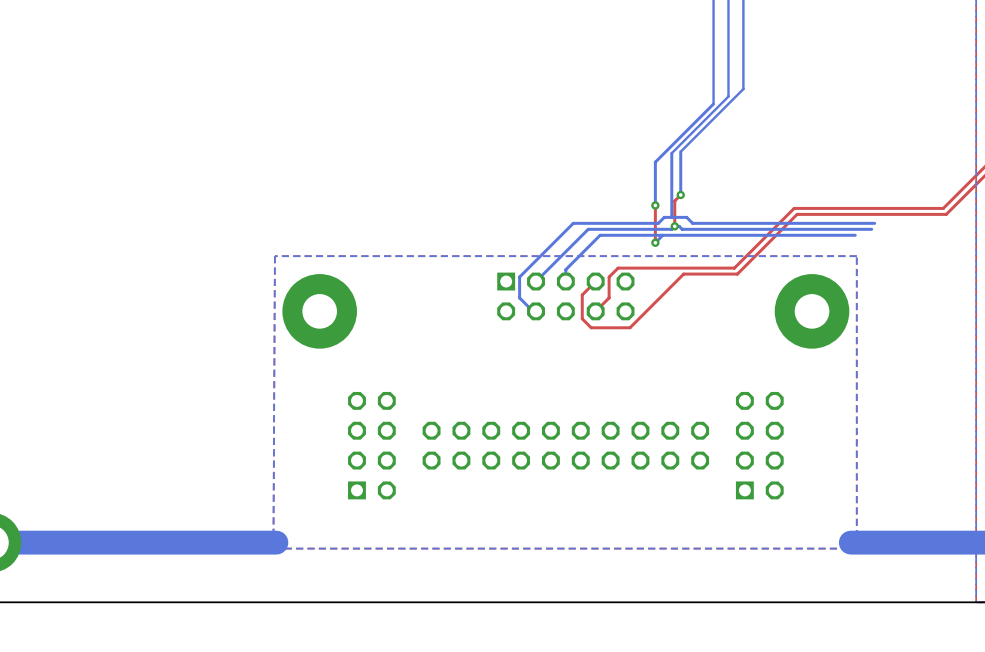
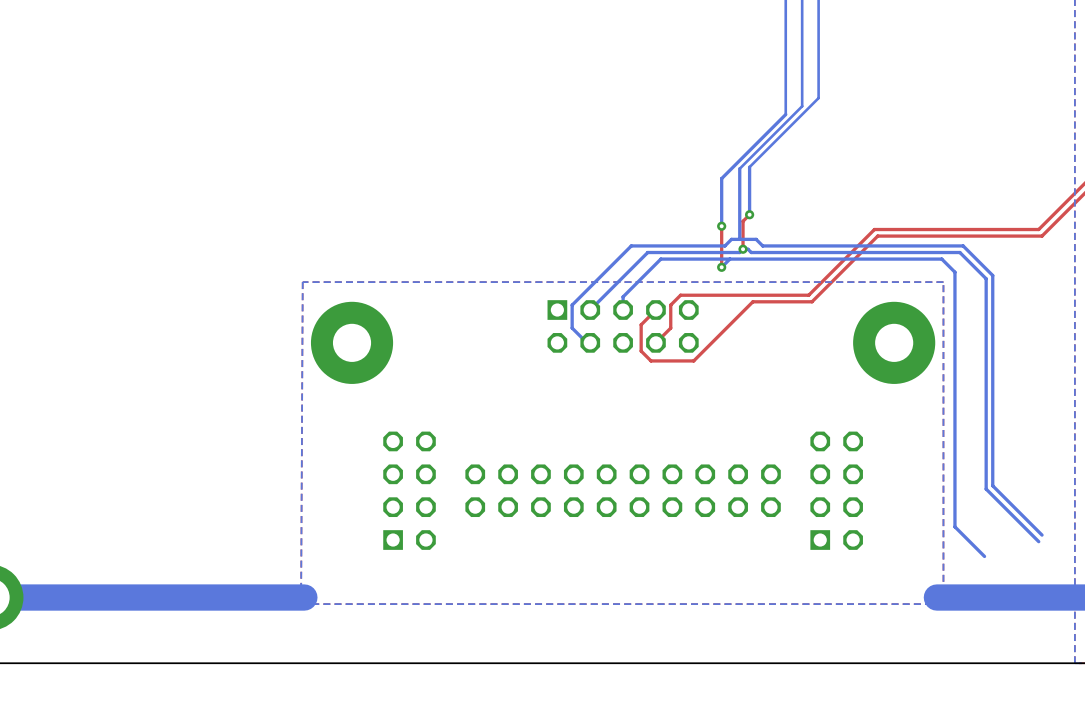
bottom track: none -> (963, 245) (992, 275) (992, 485) (1042, 535)
bottom track: none -> (959, 252) (986, 278) (986, 489) (1038, 541)
bottom track: none -> (941, 259) (954, 272) (954, 526) (984, 556)

